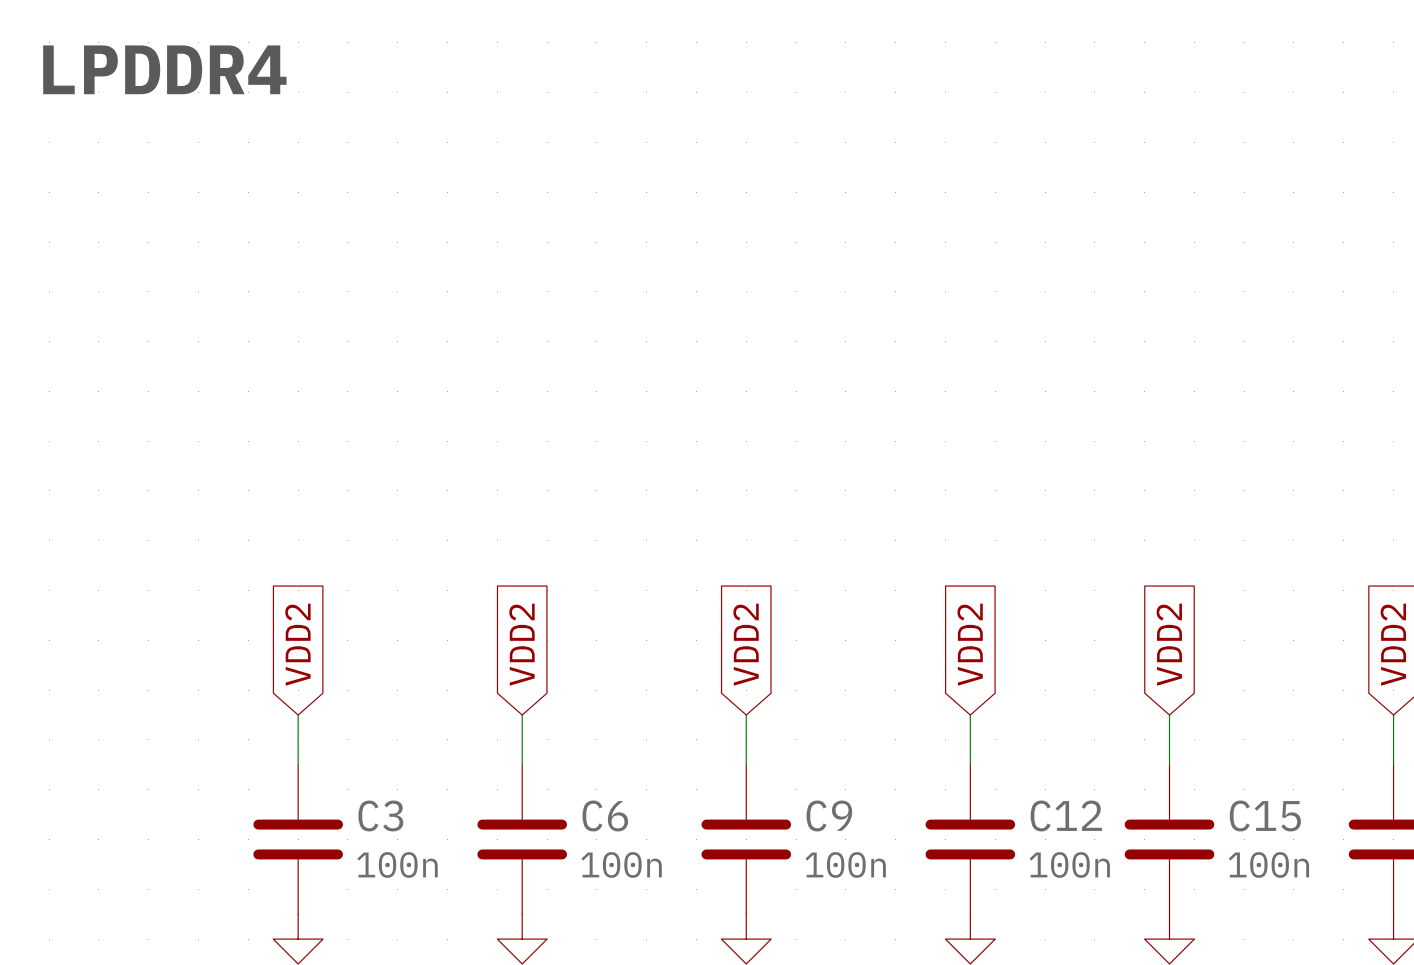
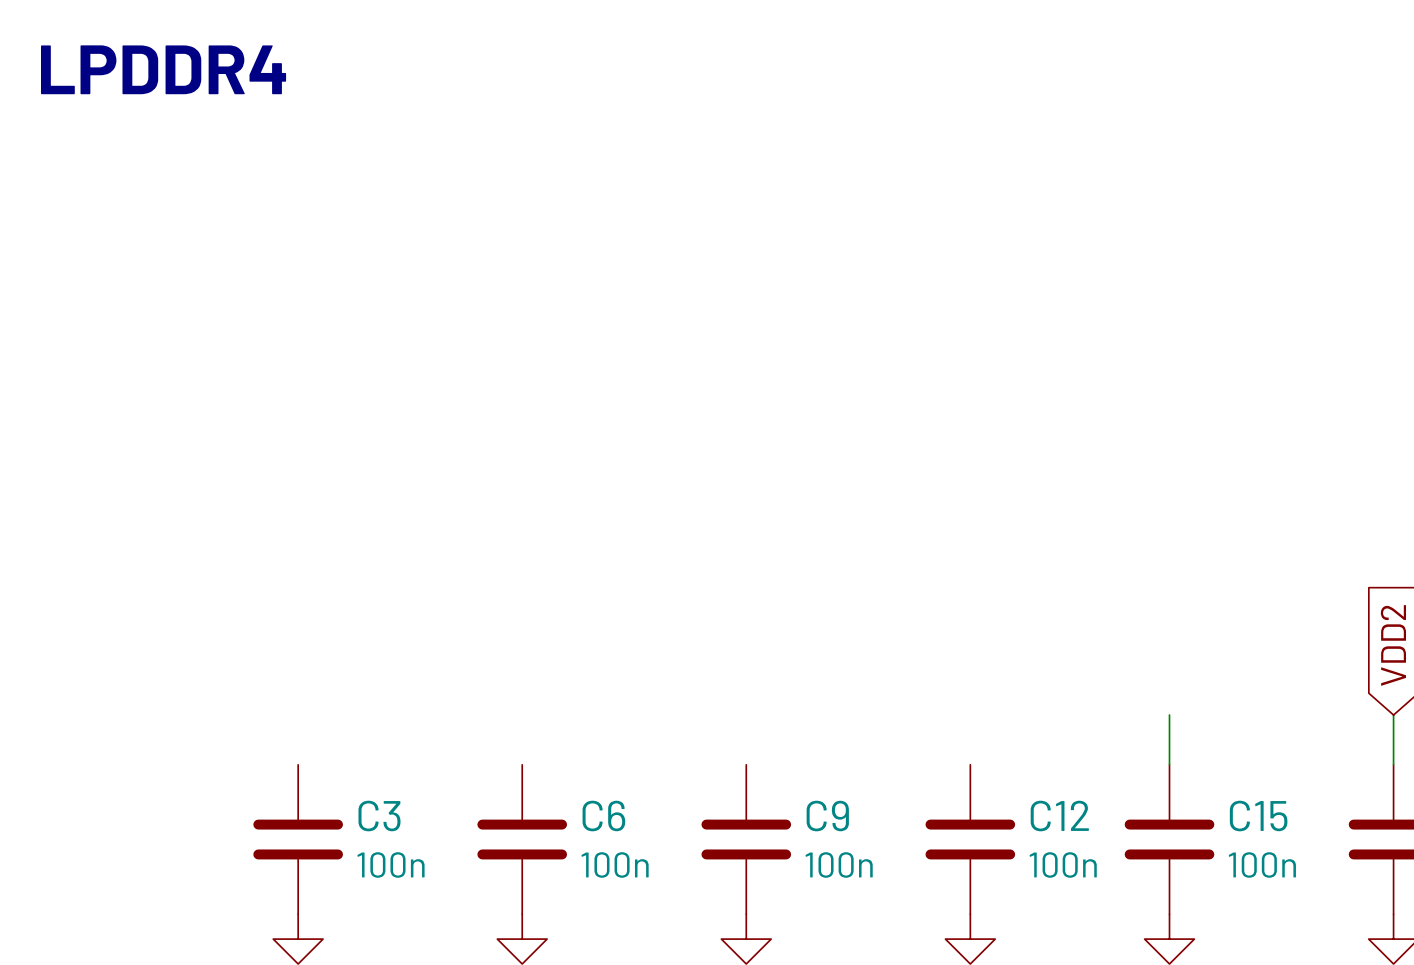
global label: VDD2 (297, 644) -> none
global label: VDD2 (522, 644) -> none
global label: VDD2 (746, 644) -> none
global label: VDD2 (970, 644) -> none
global label: VDD2 (1169, 644) -> none
wire: (298, 715) (298, 764) -> none
wire: (522, 715) (522, 764) -> none
wire: (746, 715) (746, 764) -> none
wire: (970, 715) (970, 764) -> none

